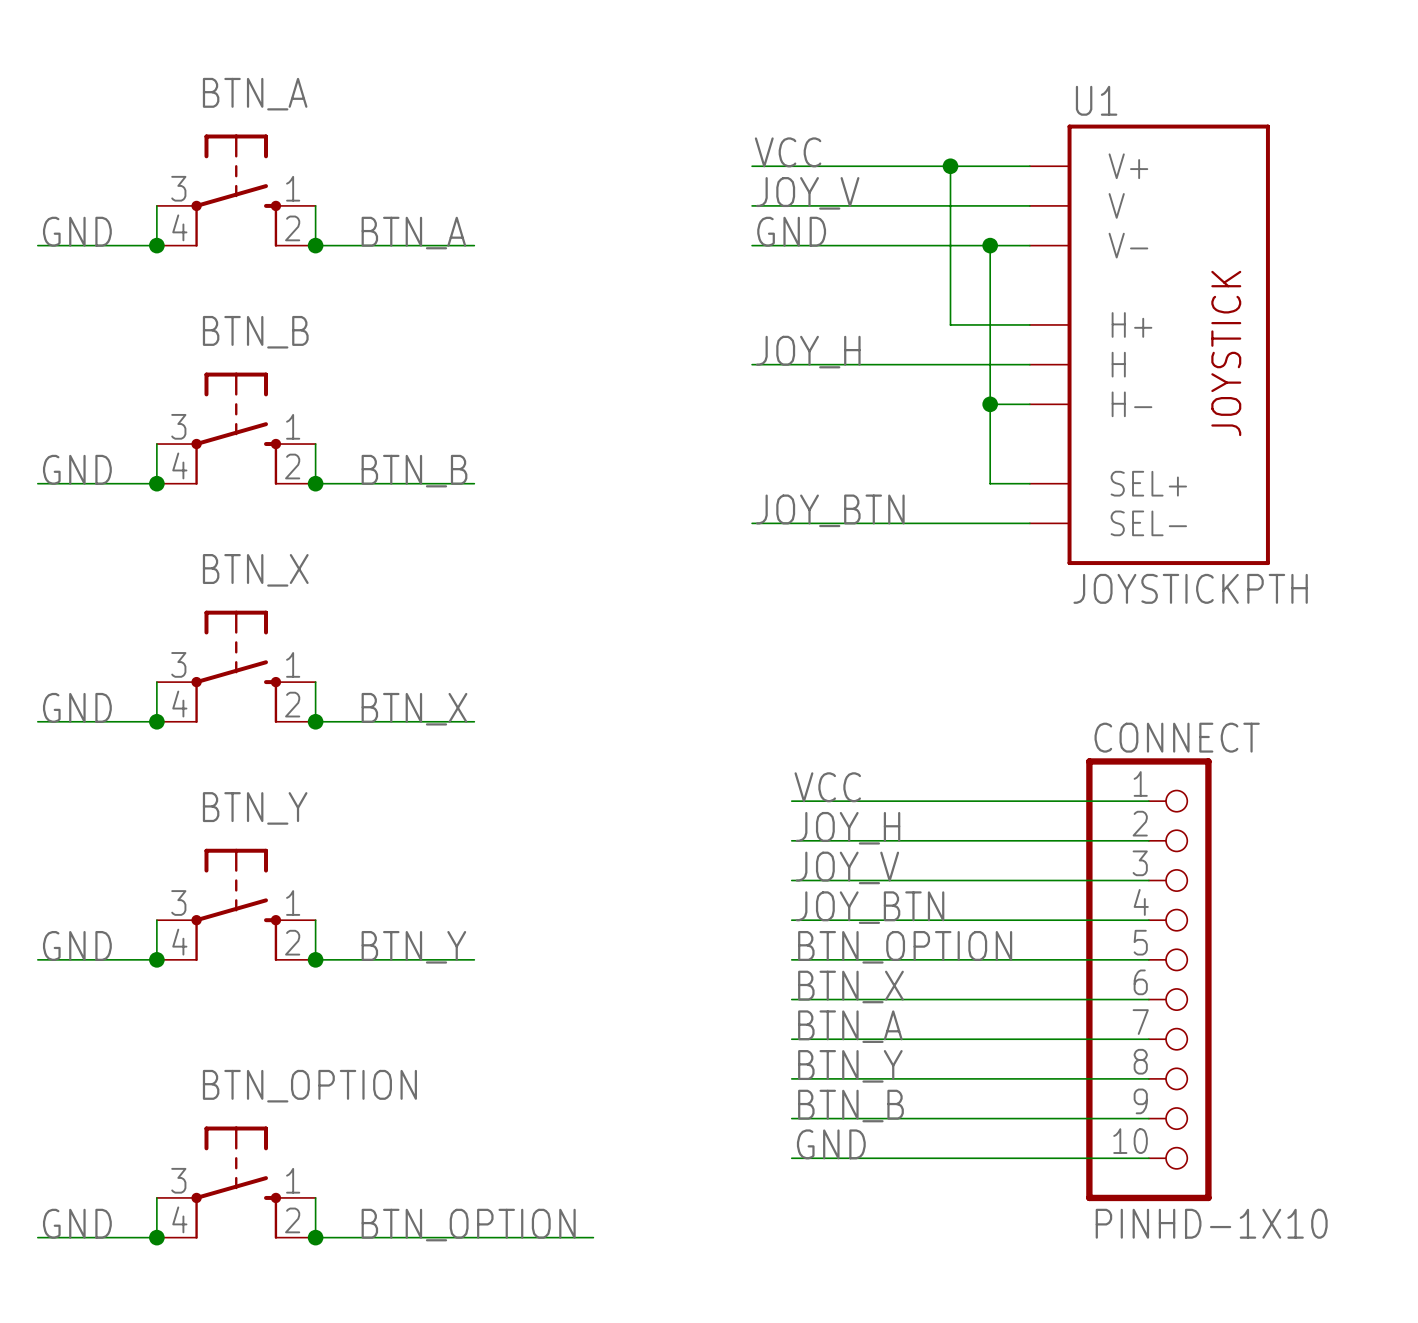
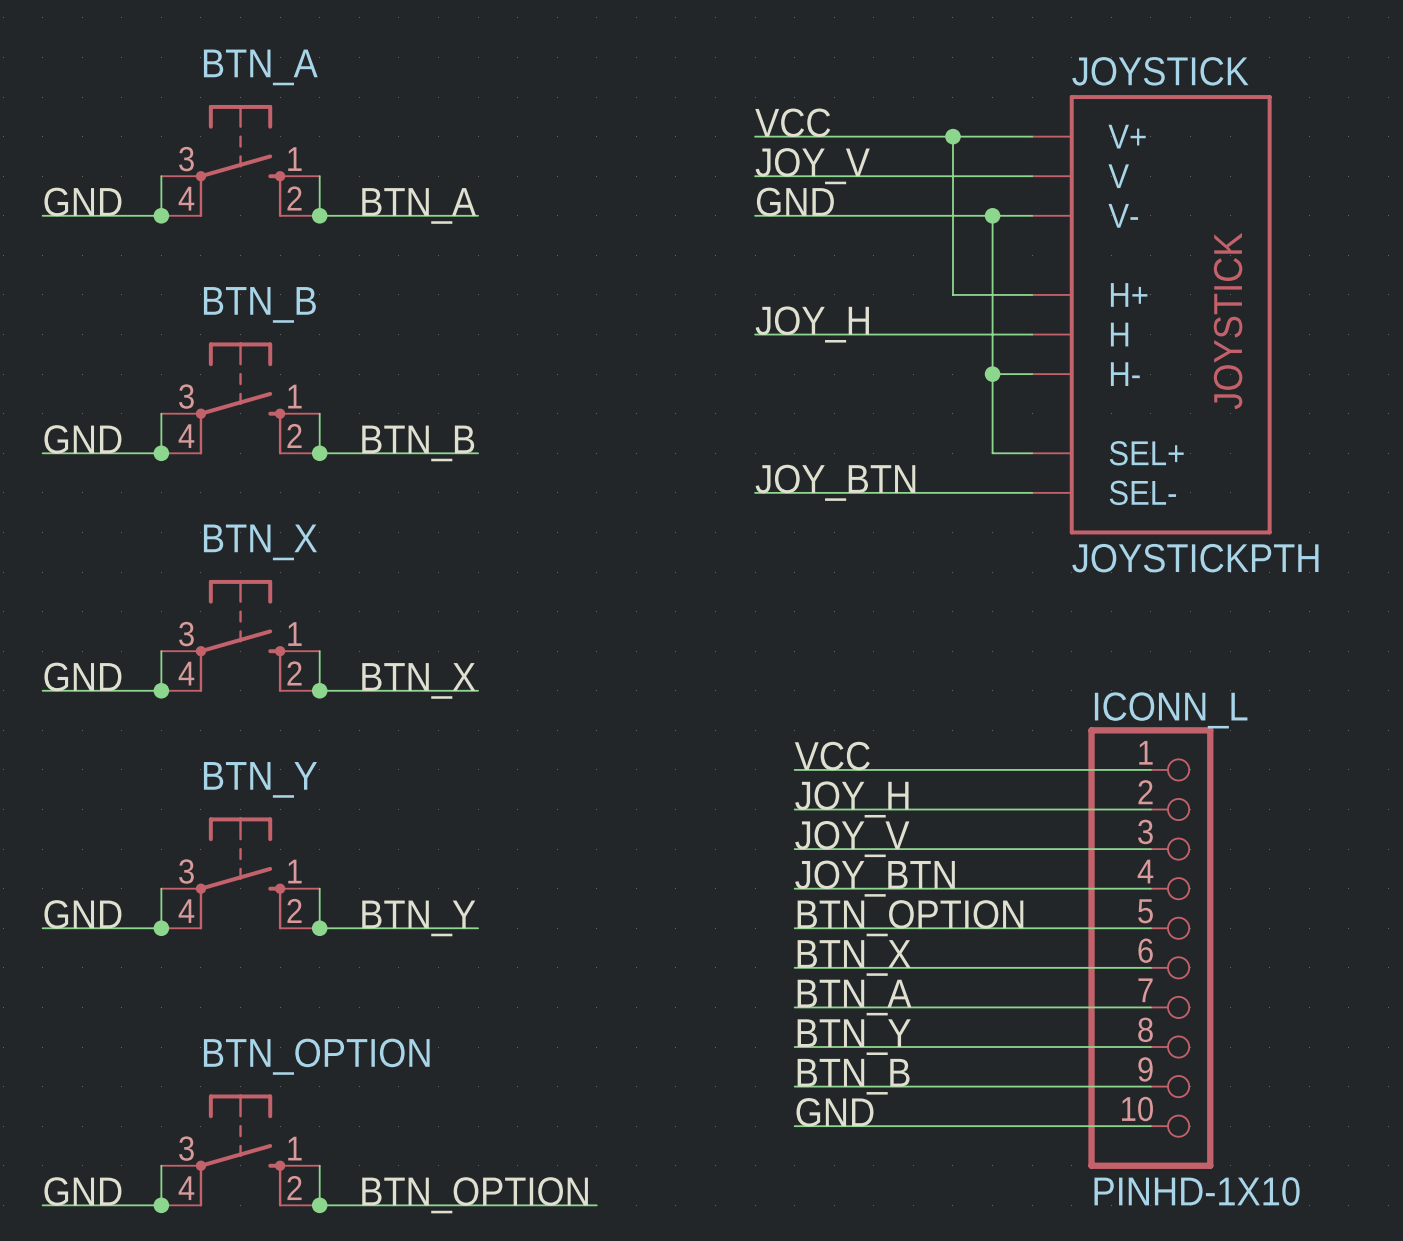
U1 name: U1 (1096, 100) -> JOYSTICK (1160, 71)
CONNECT name: CONNECT (1177, 737) -> ICONN_L (1171, 710)

